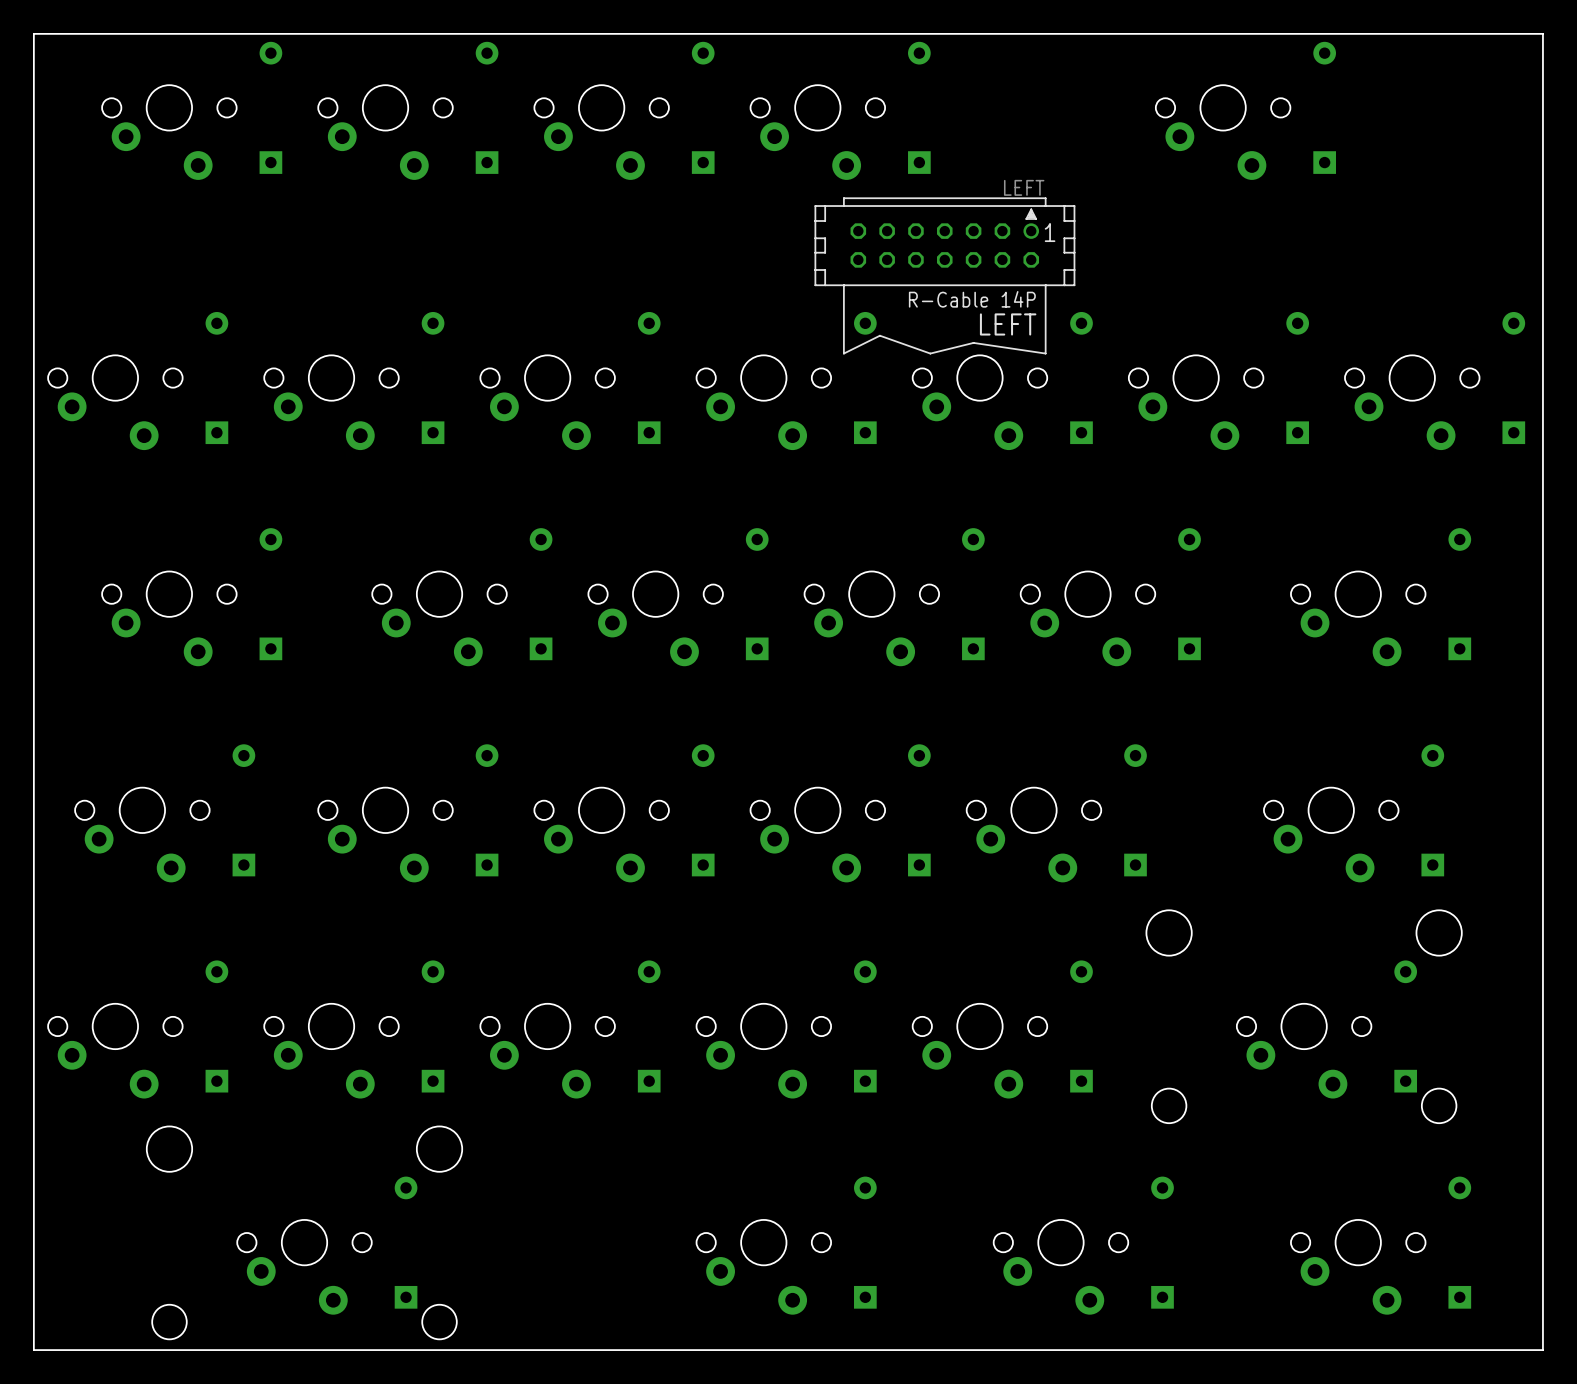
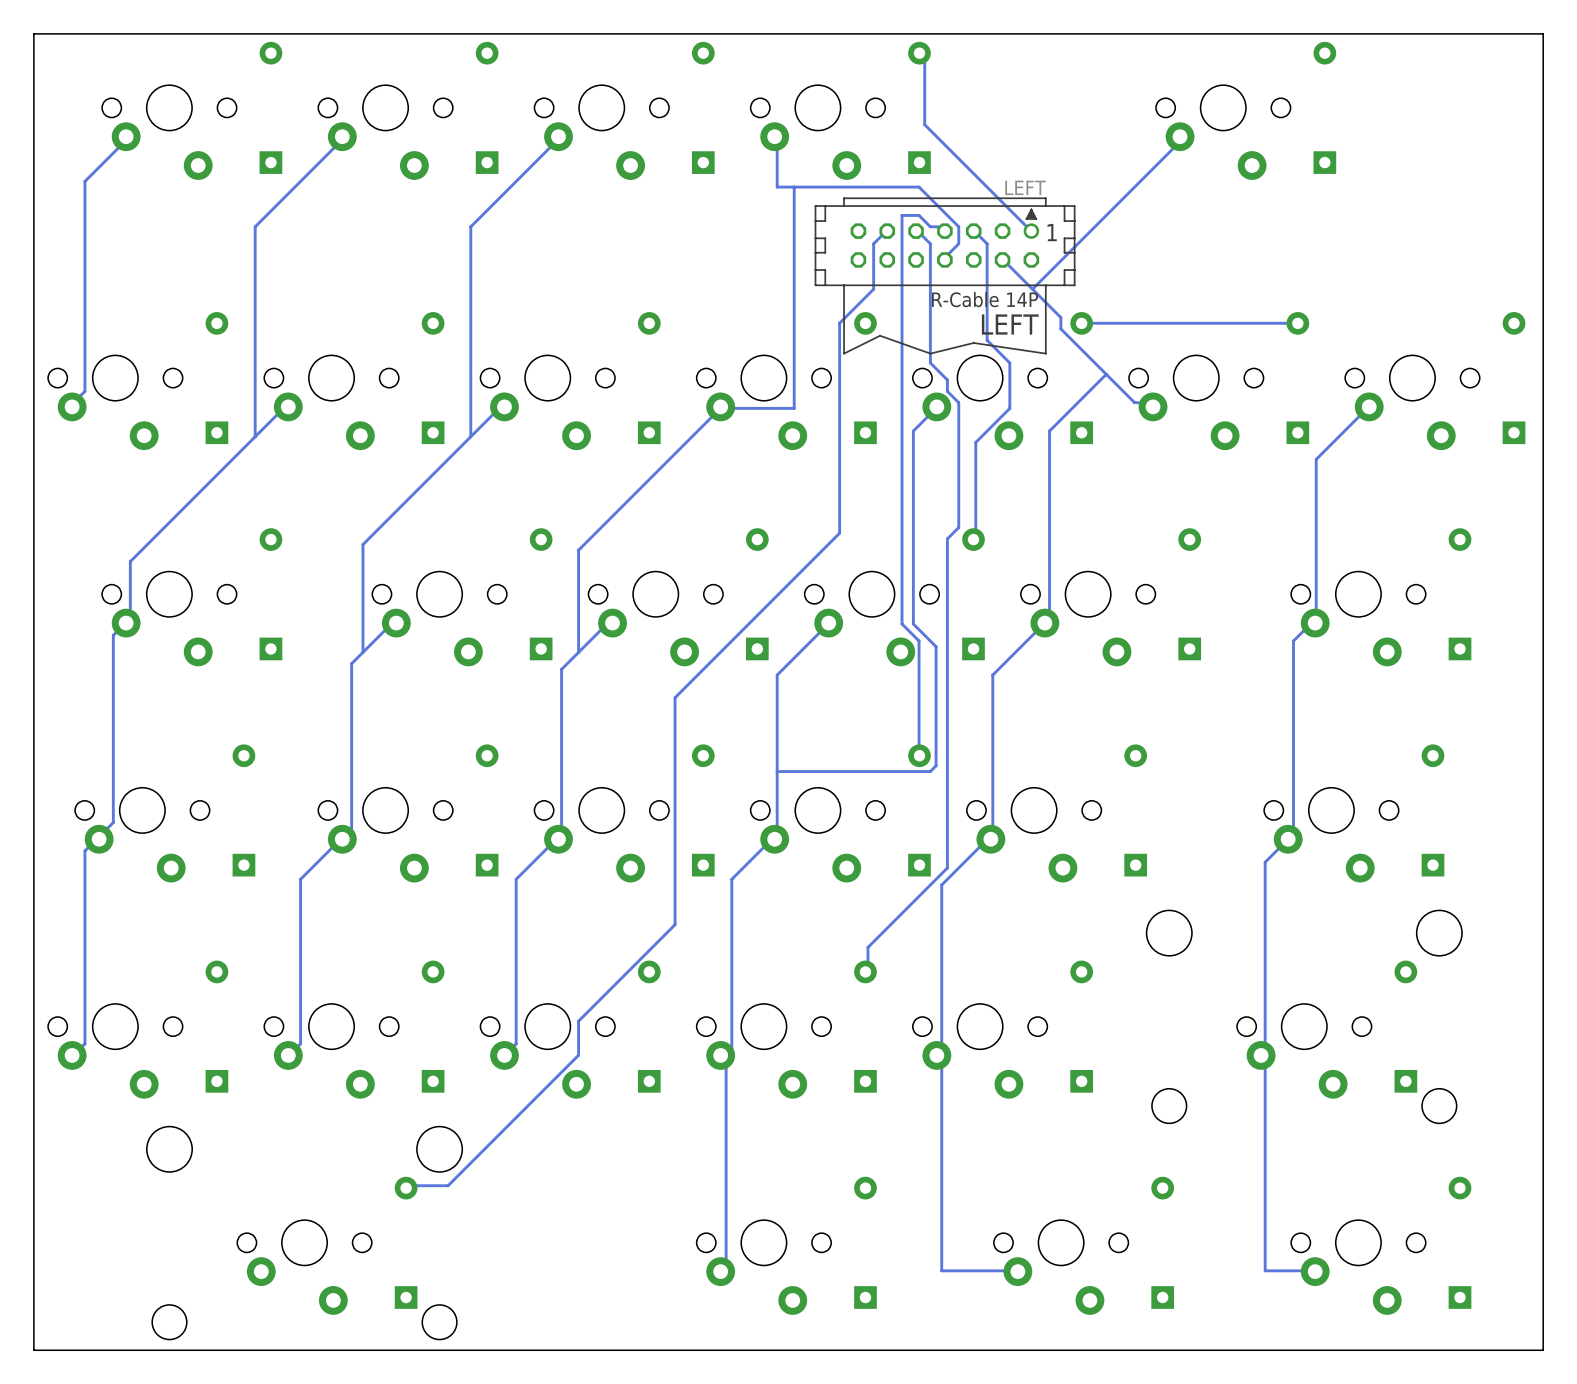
track: none -> (919, 53) (924, 56) (924, 124) (1031, 231)
track: none -> (126, 136) (124, 141) (84, 181) (84, 391) (73, 402) (72, 406)
track: none -> (342, 136) (340, 141) (255, 226) (255, 436)
track: none -> (558, 136) (555, 141) (470, 226) (470, 436)
track: none -> (774, 136) (777, 141) (777, 187) (919, 187) (958, 226) (958, 243) (944, 259)
track: none -> (1180, 136) (1180, 141) (1032, 289)
track: none -> (794, 187) (794, 408) (720, 406) (578, 550) (578, 652)
track: none -> (887, 231) (873, 243) (873, 289) (839, 323) (839, 533) (675, 697) (675, 924) (578, 1021) (578, 1055) (448, 1185) (408, 1185) (406, 1188)
track: none -> (916, 231) (930, 243) (930, 362) (947, 380) (947, 391) (958, 402) (958, 527) (947, 538) (947, 867) (867, 947) (867, 970) (865, 971)
track: none -> (944, 231) (941, 226) (930, 226) (919, 215) (902, 215) (902, 623) (919, 641) (919, 755)
track: none -> (973, 231) (987, 243) (987, 340) (1009, 362) (1009, 408) (975, 442) (975, 538) (973, 539)
track: none -> (1002, 259) (1060, 317) (1060, 328) (1134, 402) (1151, 402) (1153, 406)
track: none -> (1297, 323) (1081, 323)
track: none -> (1106, 374) (1049, 431) (1049, 618) (992, 675) (992, 833) (990, 839) (987, 839) (941, 884) (941, 1055) (936, 1055) (941, 1060) (941, 1270) (1017, 1271)
track: none -> (288, 406) (283, 408) (130, 561) (130, 618) (113, 635) (113, 822) (99, 839) (96, 839) (84, 850) (84, 1043) (72, 1055)
track: none -> (504, 406) (499, 408) (362, 544) (362, 652)
track: none -> (936, 406) (913, 431) (913, 623) (936, 646) (936, 765) (930, 771) (777, 771)
track: none -> (1369, 406) (1316, 459) (1316, 618) (1315, 623) (1310, 623) (1293, 641) (1293, 833) (1265, 862) (1265, 1055) (1261, 1055) (1265, 1060) (1265, 1270) (1315, 1271)
track: none -> (396, 623) (391, 623) (351, 663) (351, 828) (300, 879) (300, 1043) (288, 1055)
track: none -> (612, 623) (606, 623) (561, 669) (561, 833) (558, 839) (555, 839) (516, 879) (516, 1043) (504, 1055)
track: none -> (828, 623) (777, 675) (777, 833) (774, 839) (771, 839) (731, 879) (731, 1049) (726, 1055) (720, 1055) (726, 1060) (726, 1270) (720, 1271)

